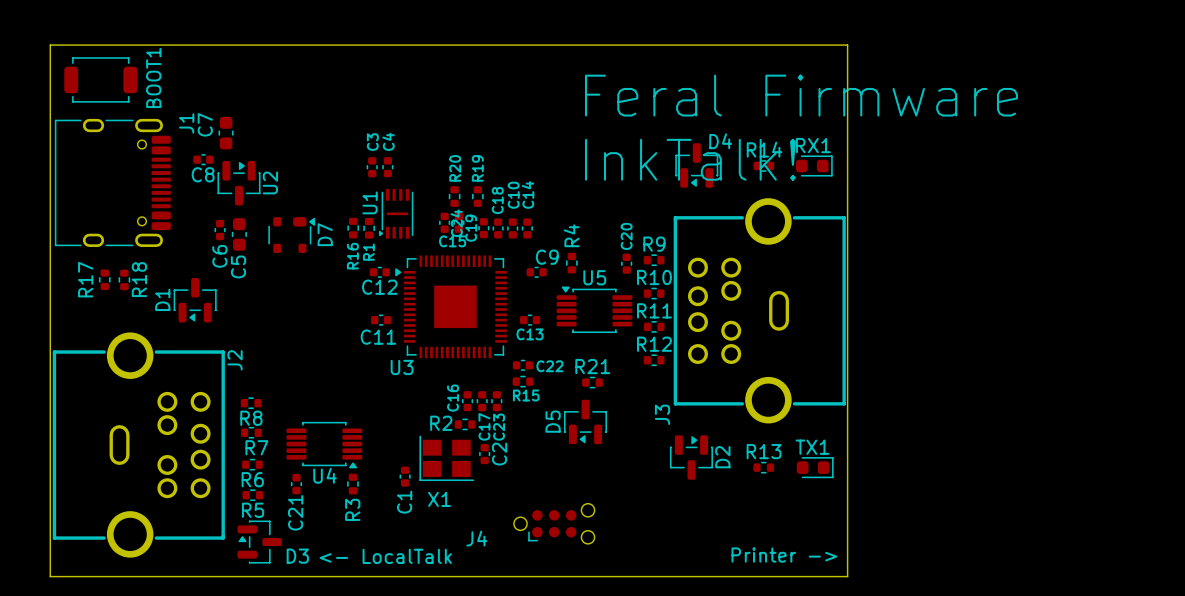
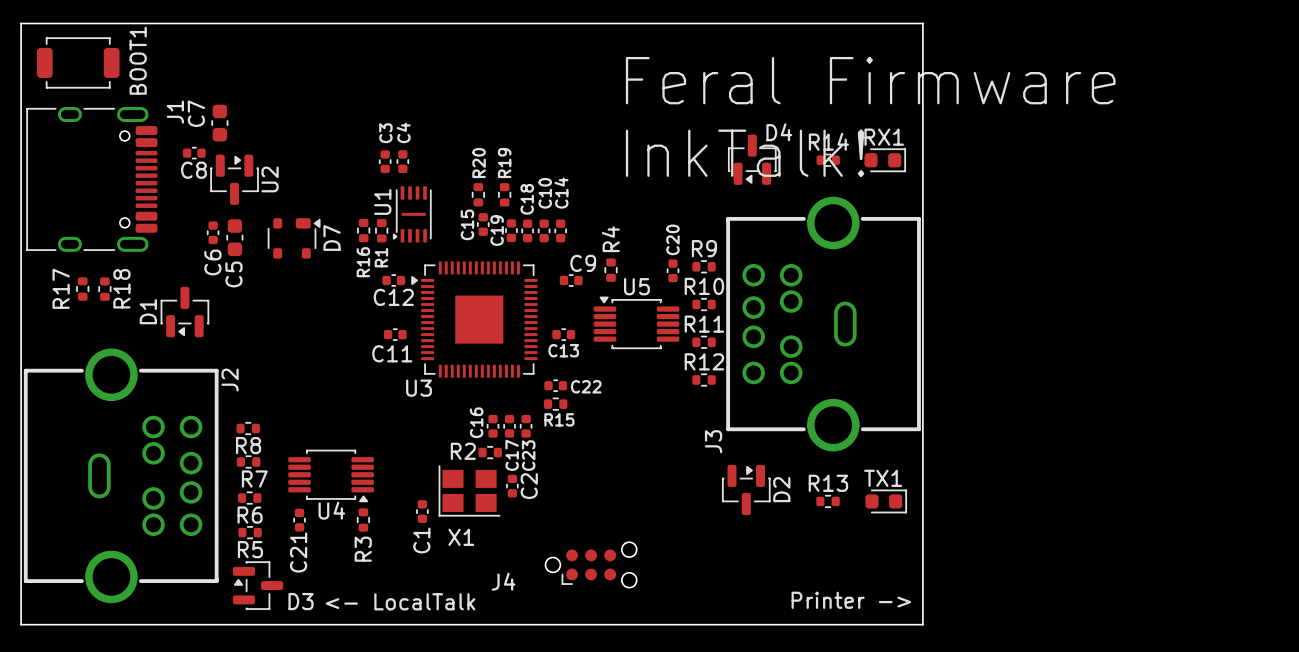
C24: (444, 222) -> none
C15 name rotation: 0° (452, 241) -> 90° counterclockwise (467, 224)
R21: (592, 382) -> none
D5: (585, 421) -> none

